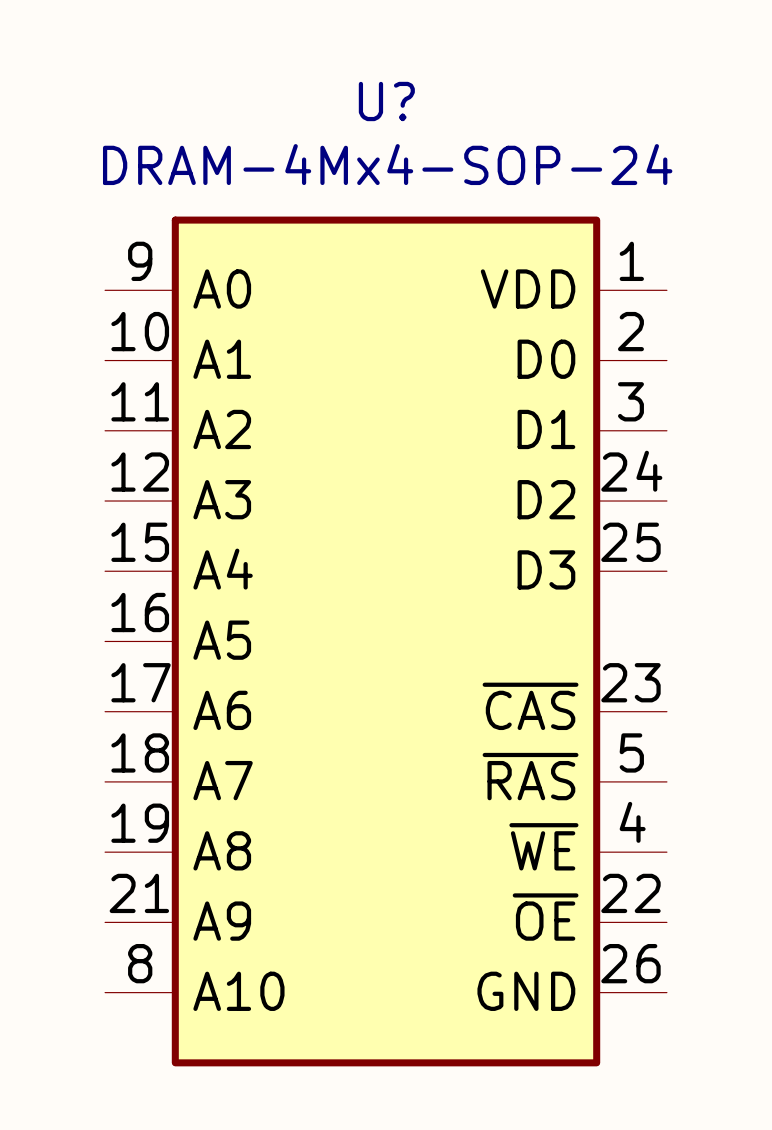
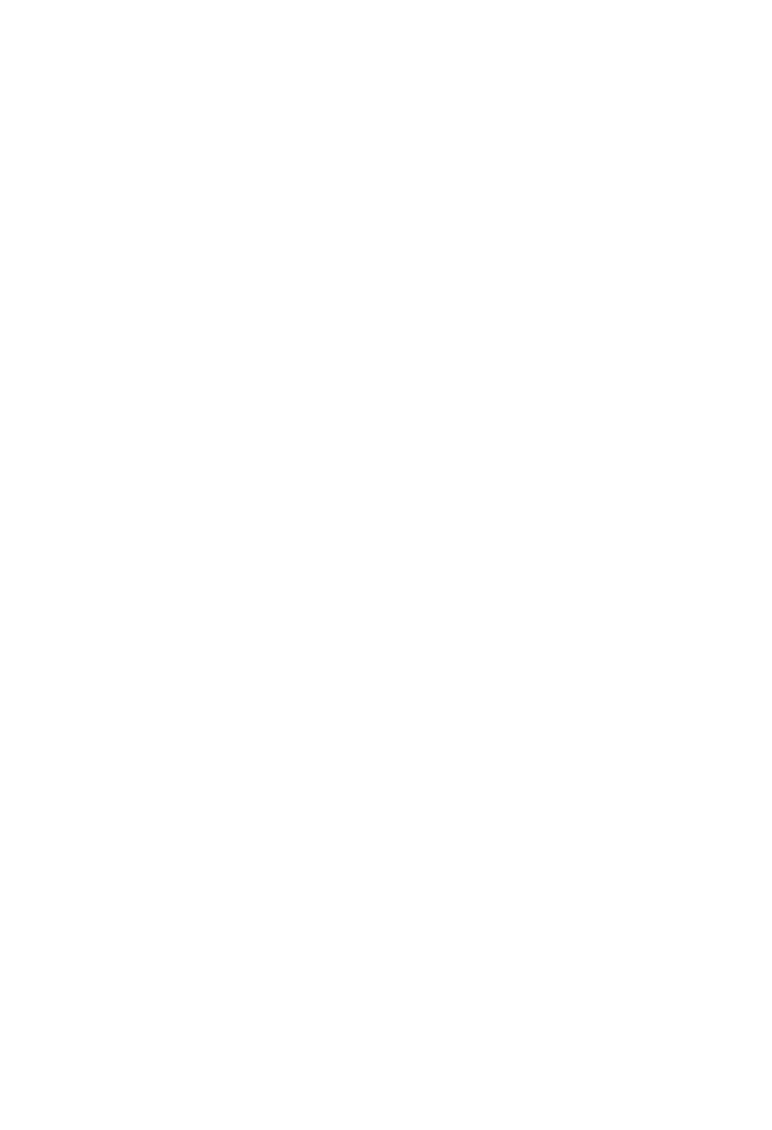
U?: DRAM-4Mx4-SOP-24 (386, 641) -> none

